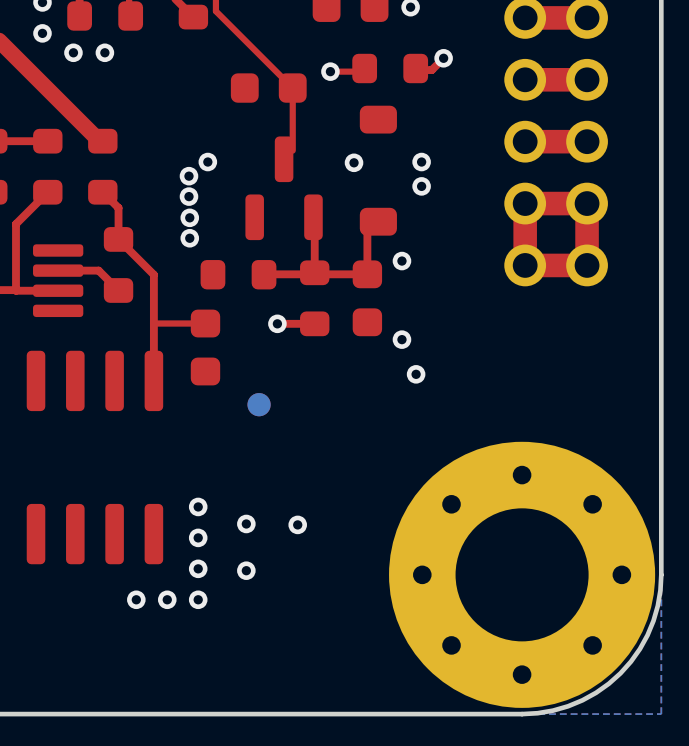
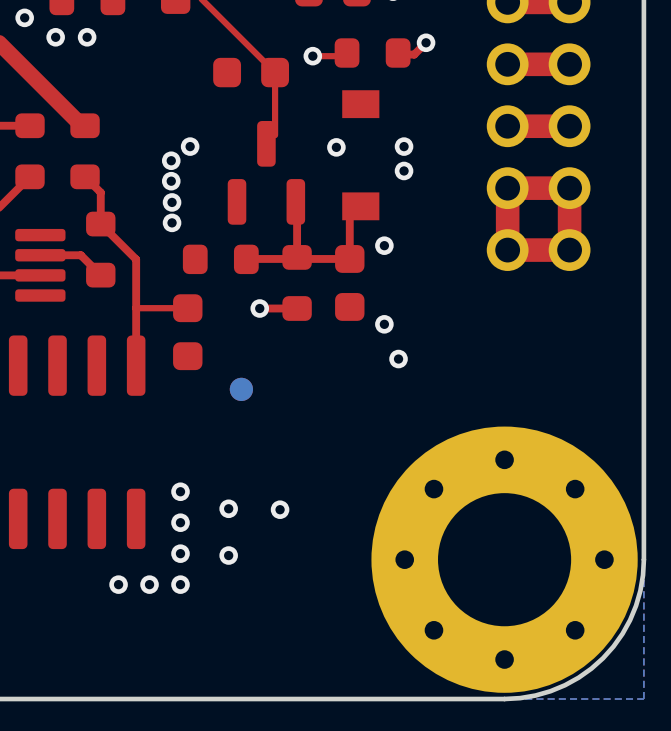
part footprint: [359, 105, 397, 236] -> [342, 90, 380, 221]

